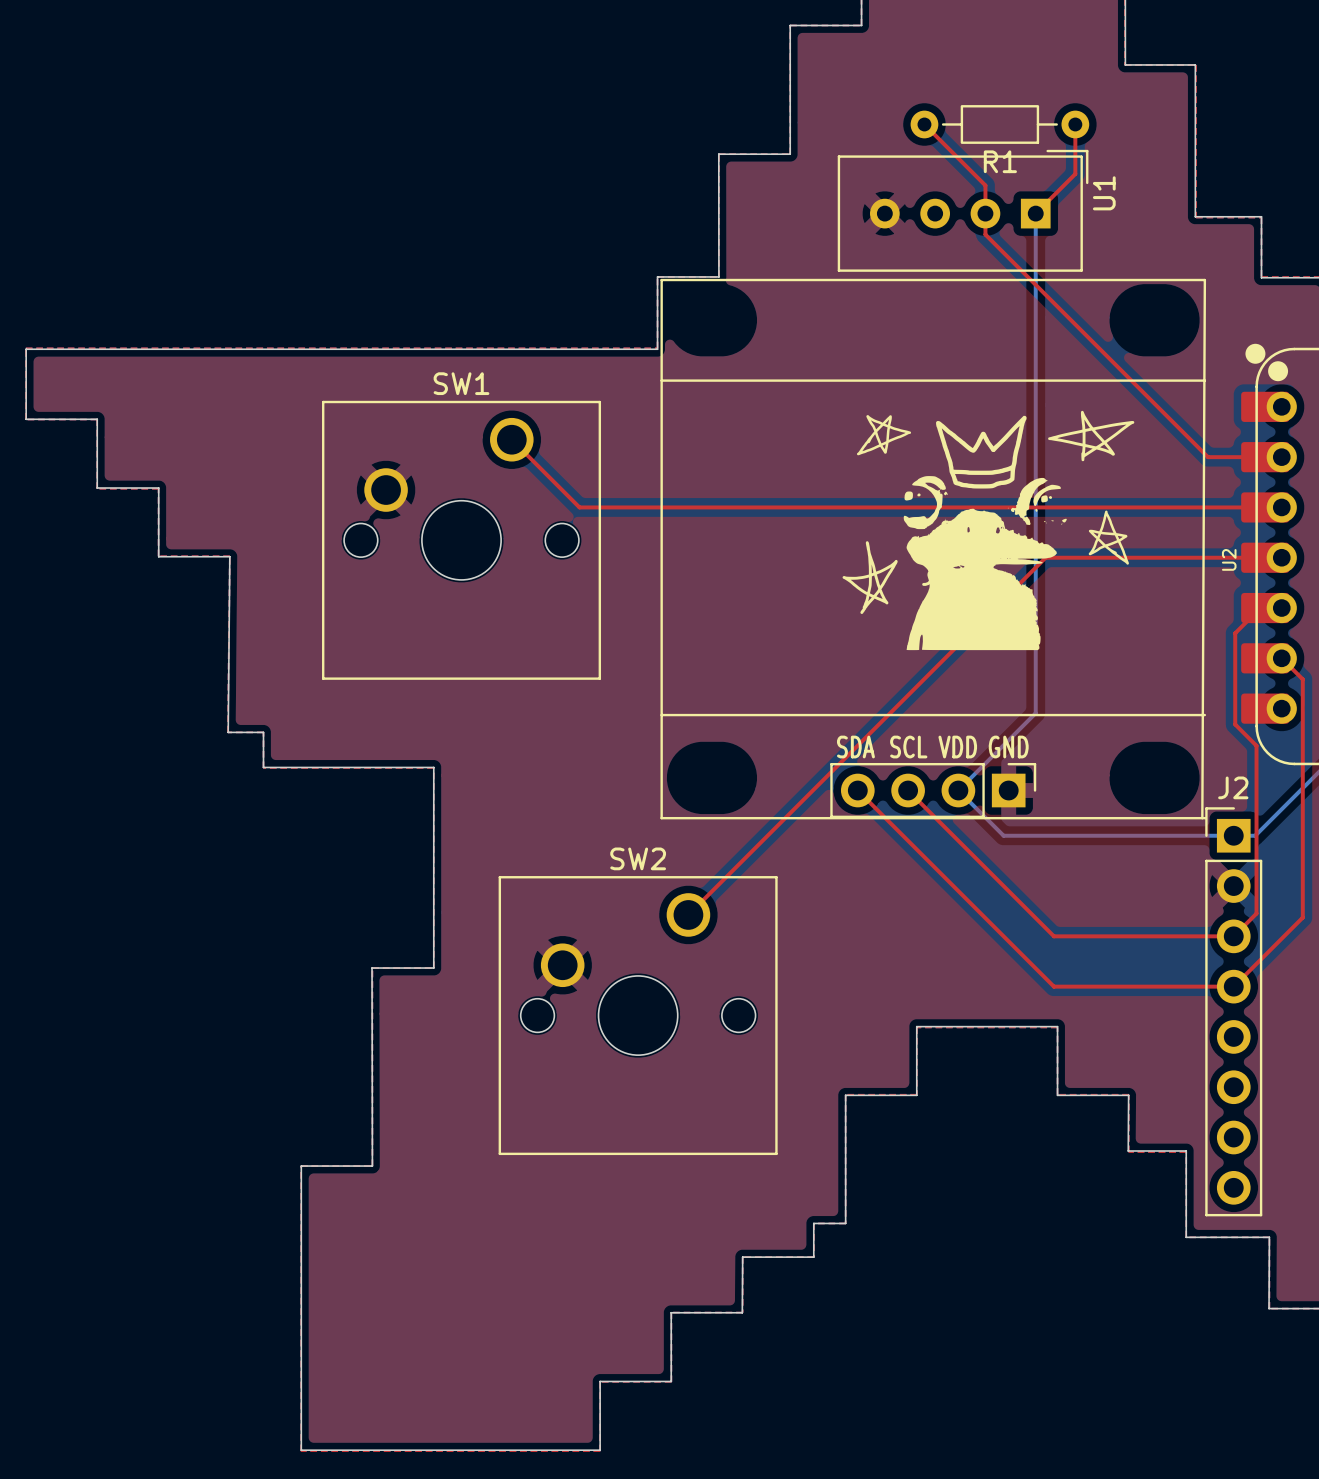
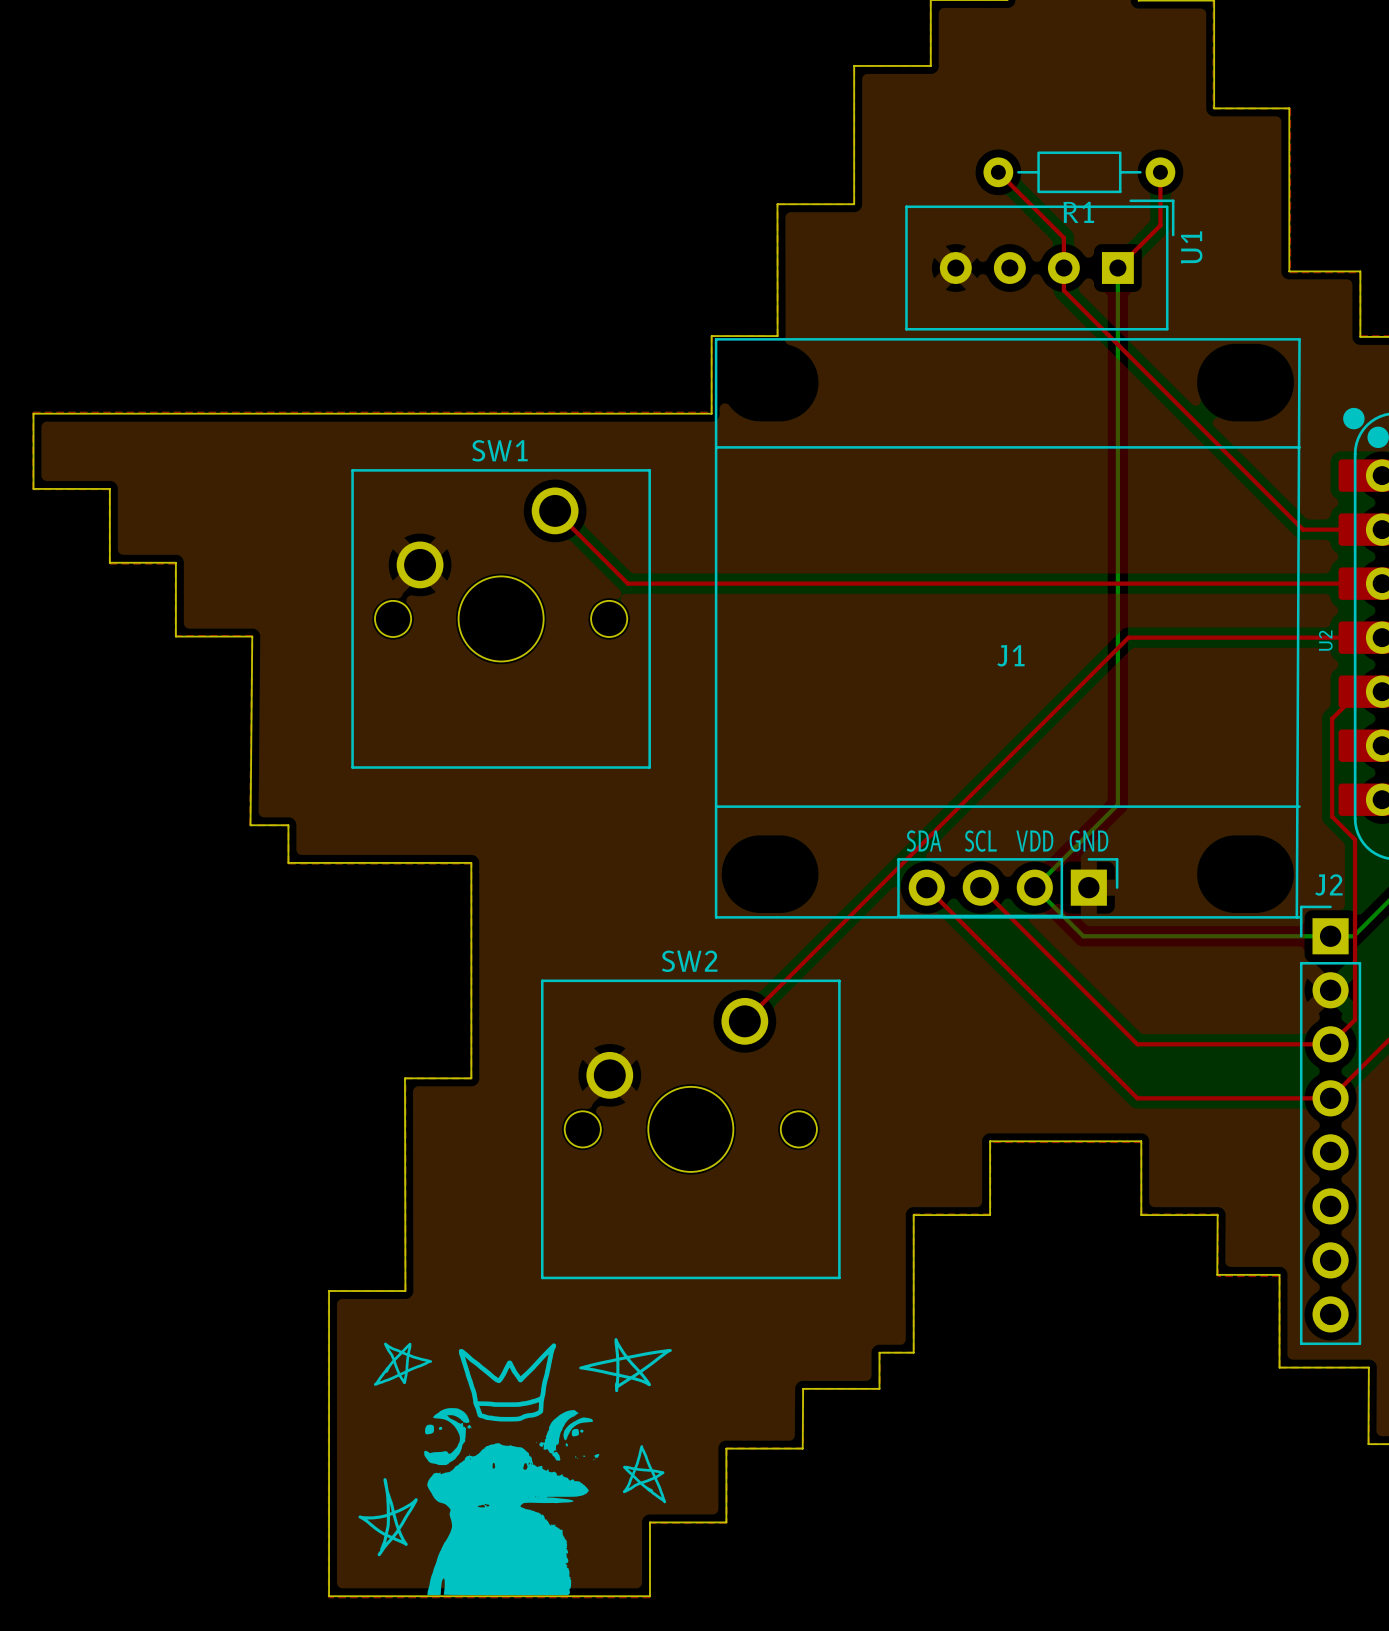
drawing: [842, 410, 1135, 651] -> none
drawing: none -> [358, 1338, 672, 1596]

